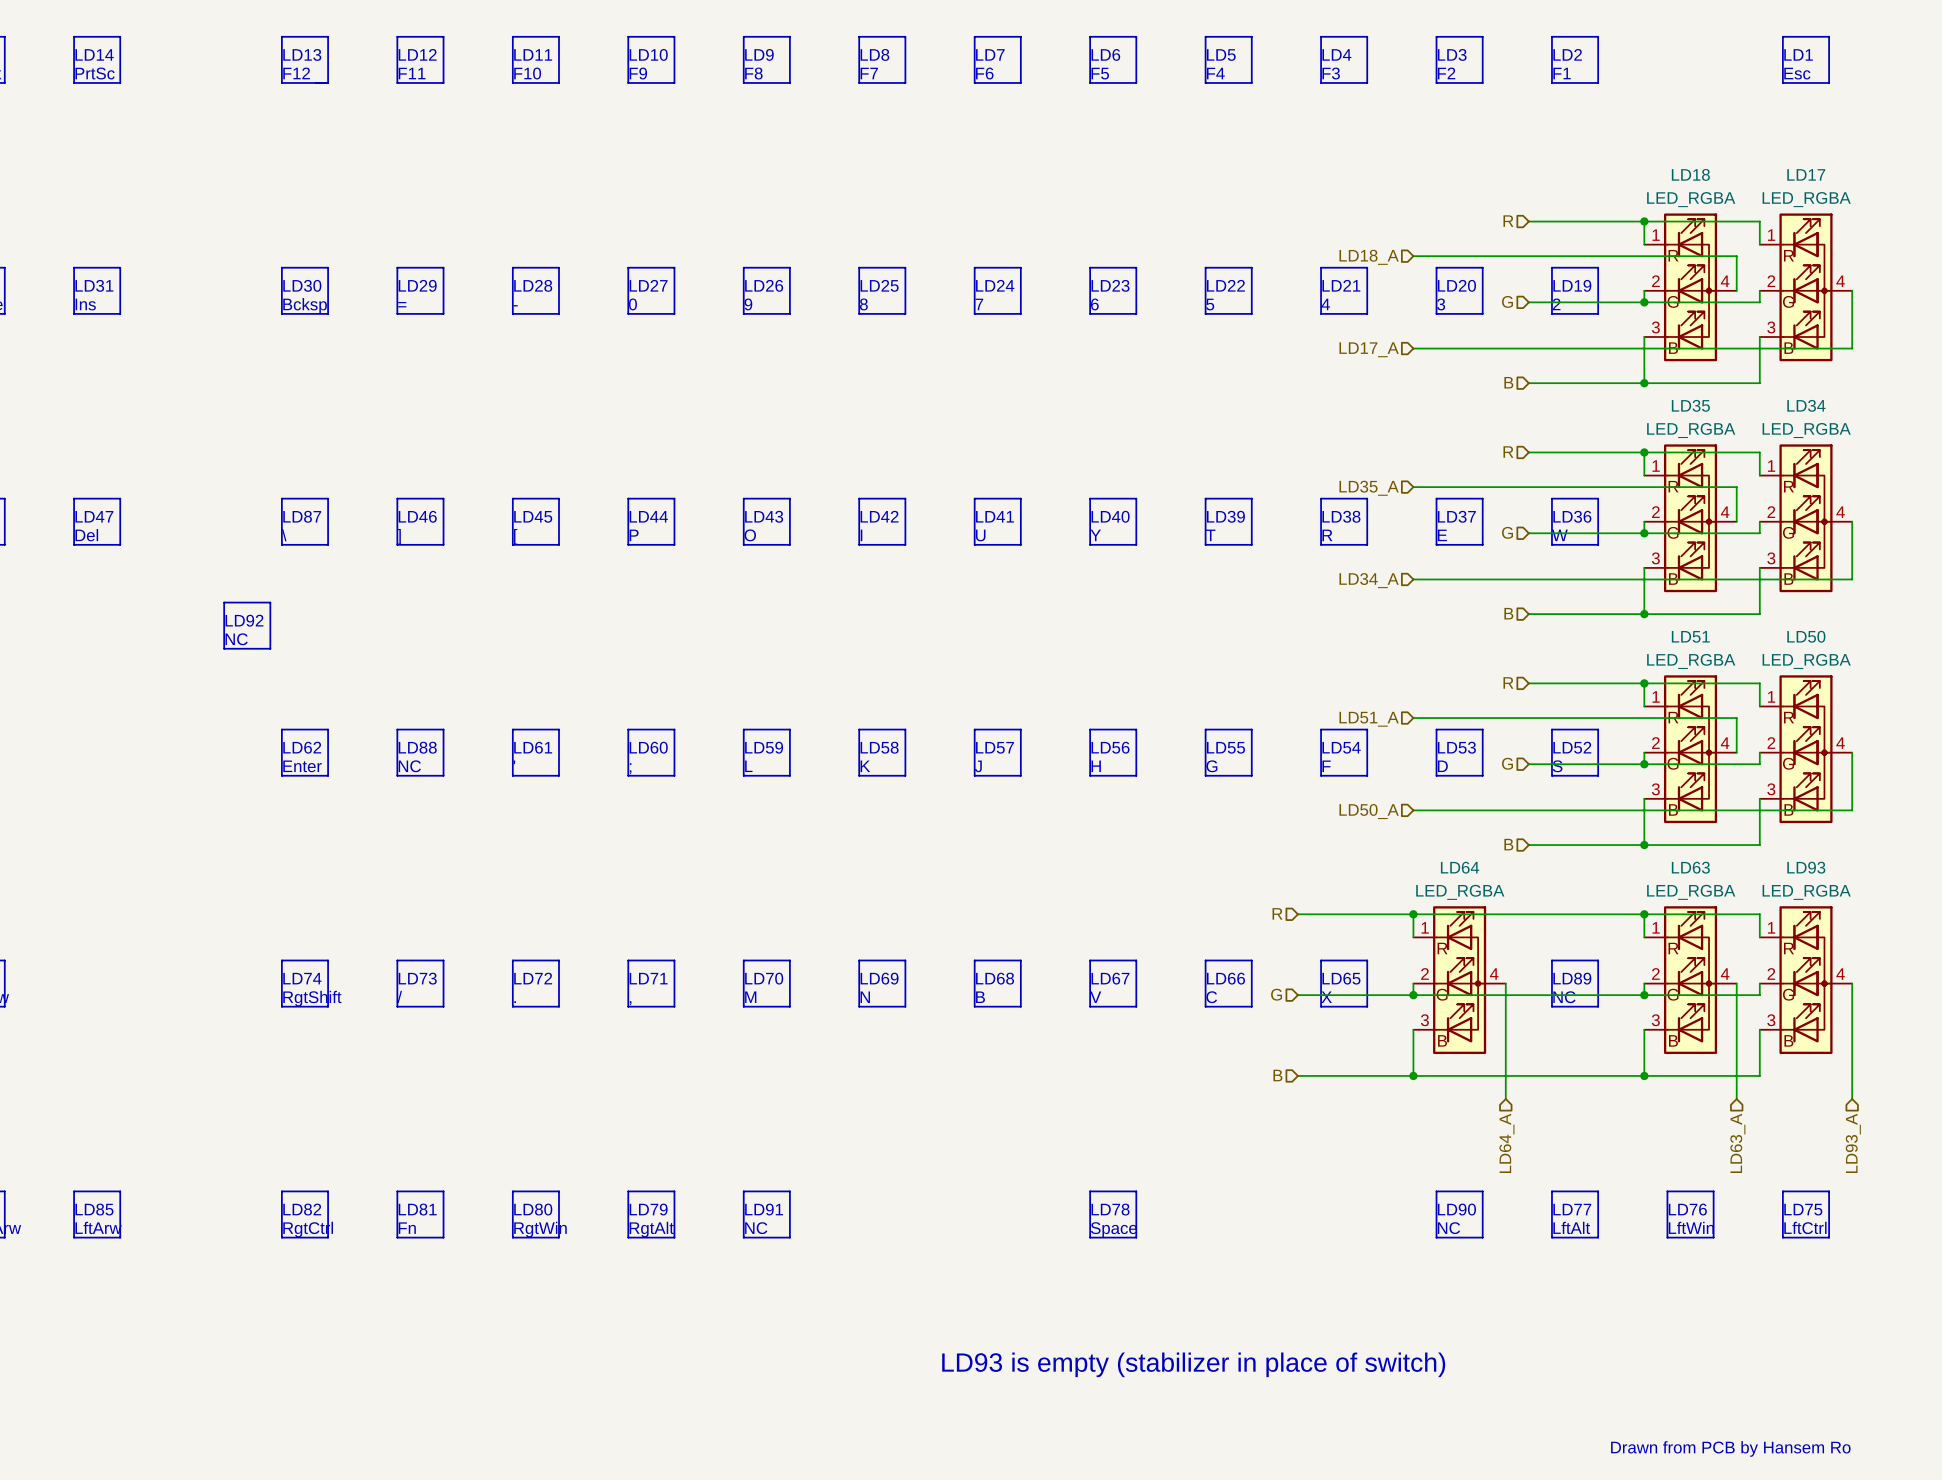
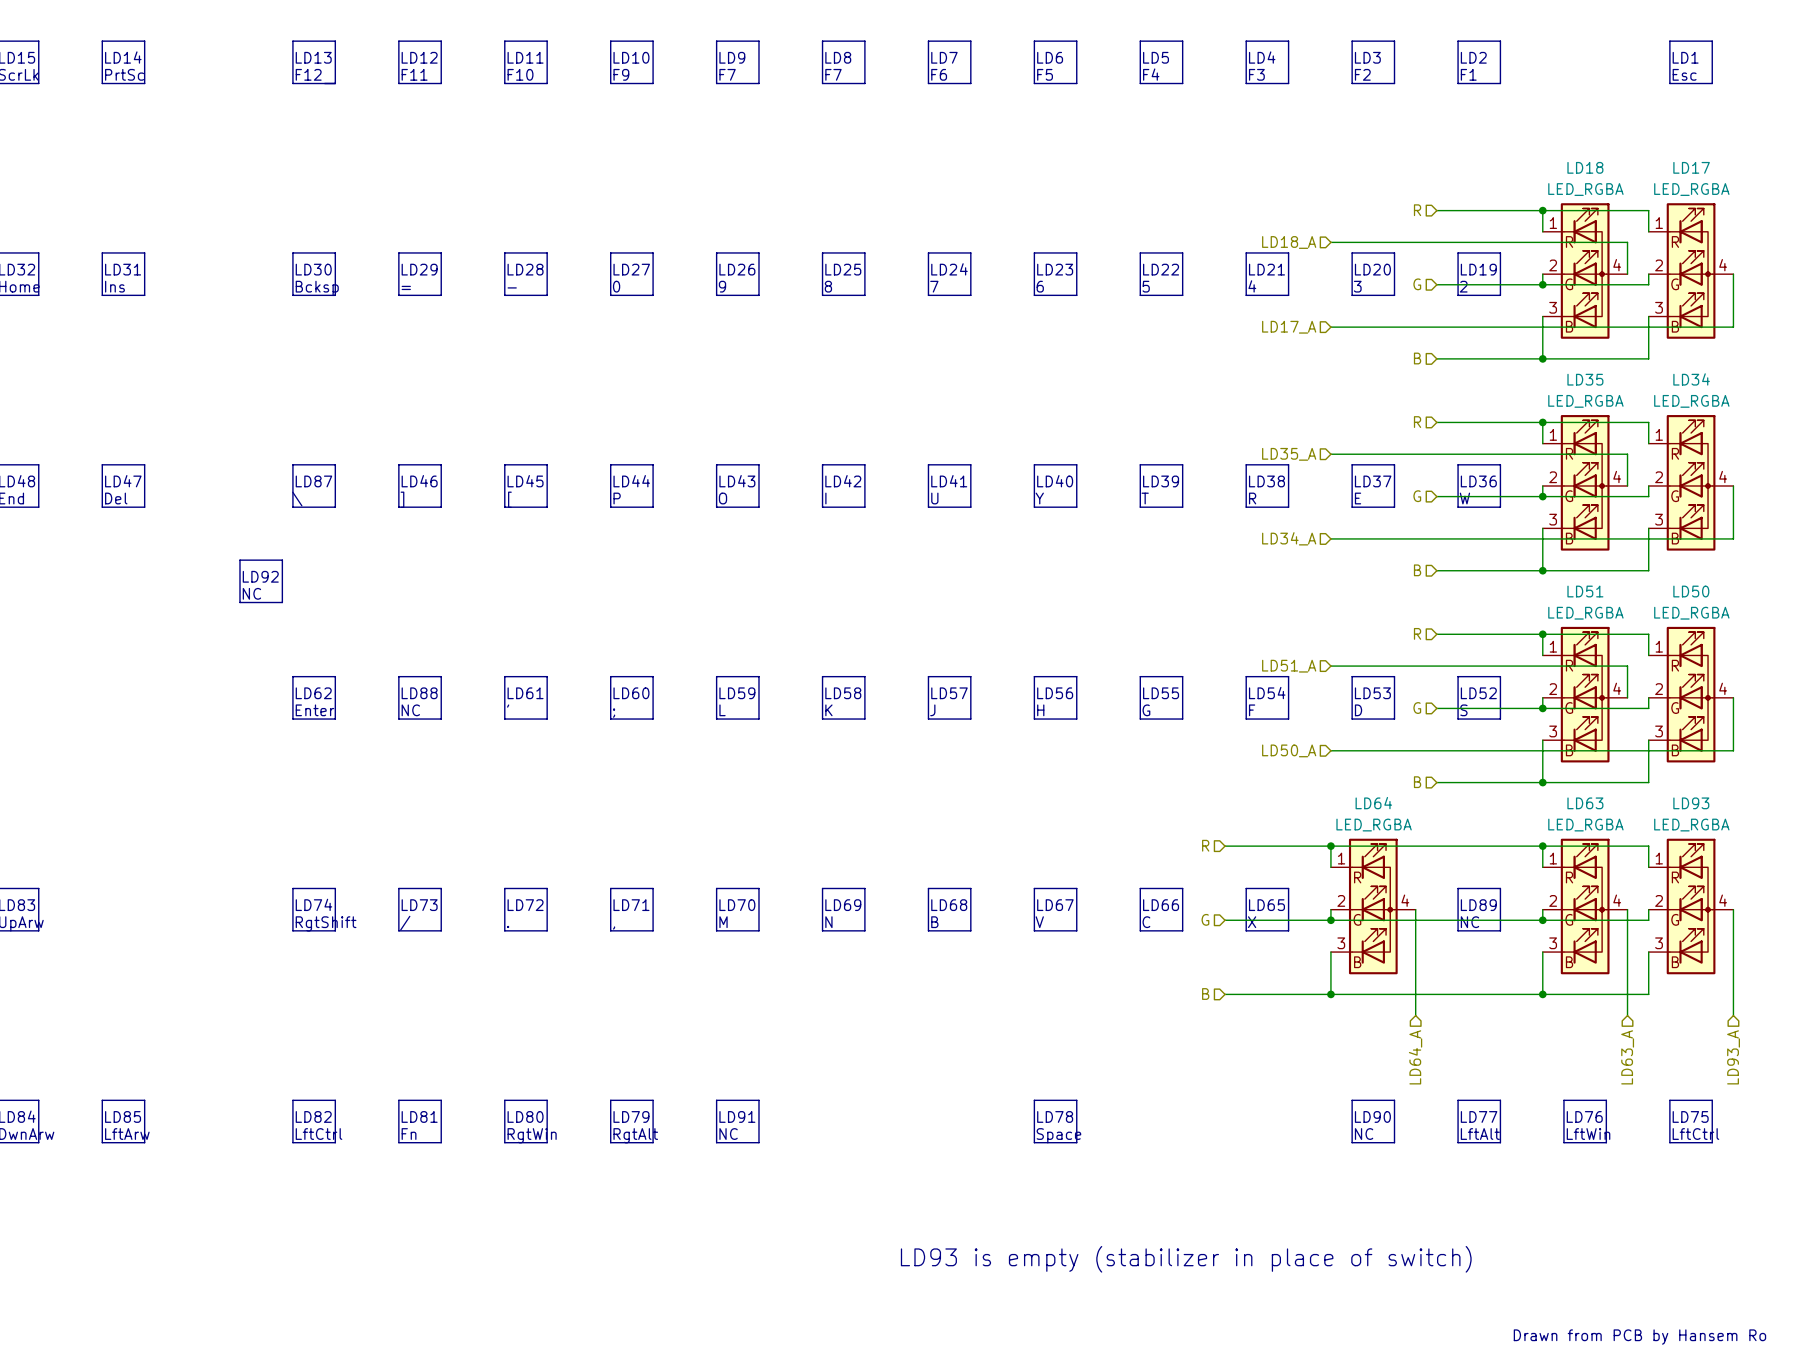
text: F8 (753, 73) -> F7 (727, 74)
text: RgtCtrl (308, 1229) -> LftCtrl (319, 1134)

